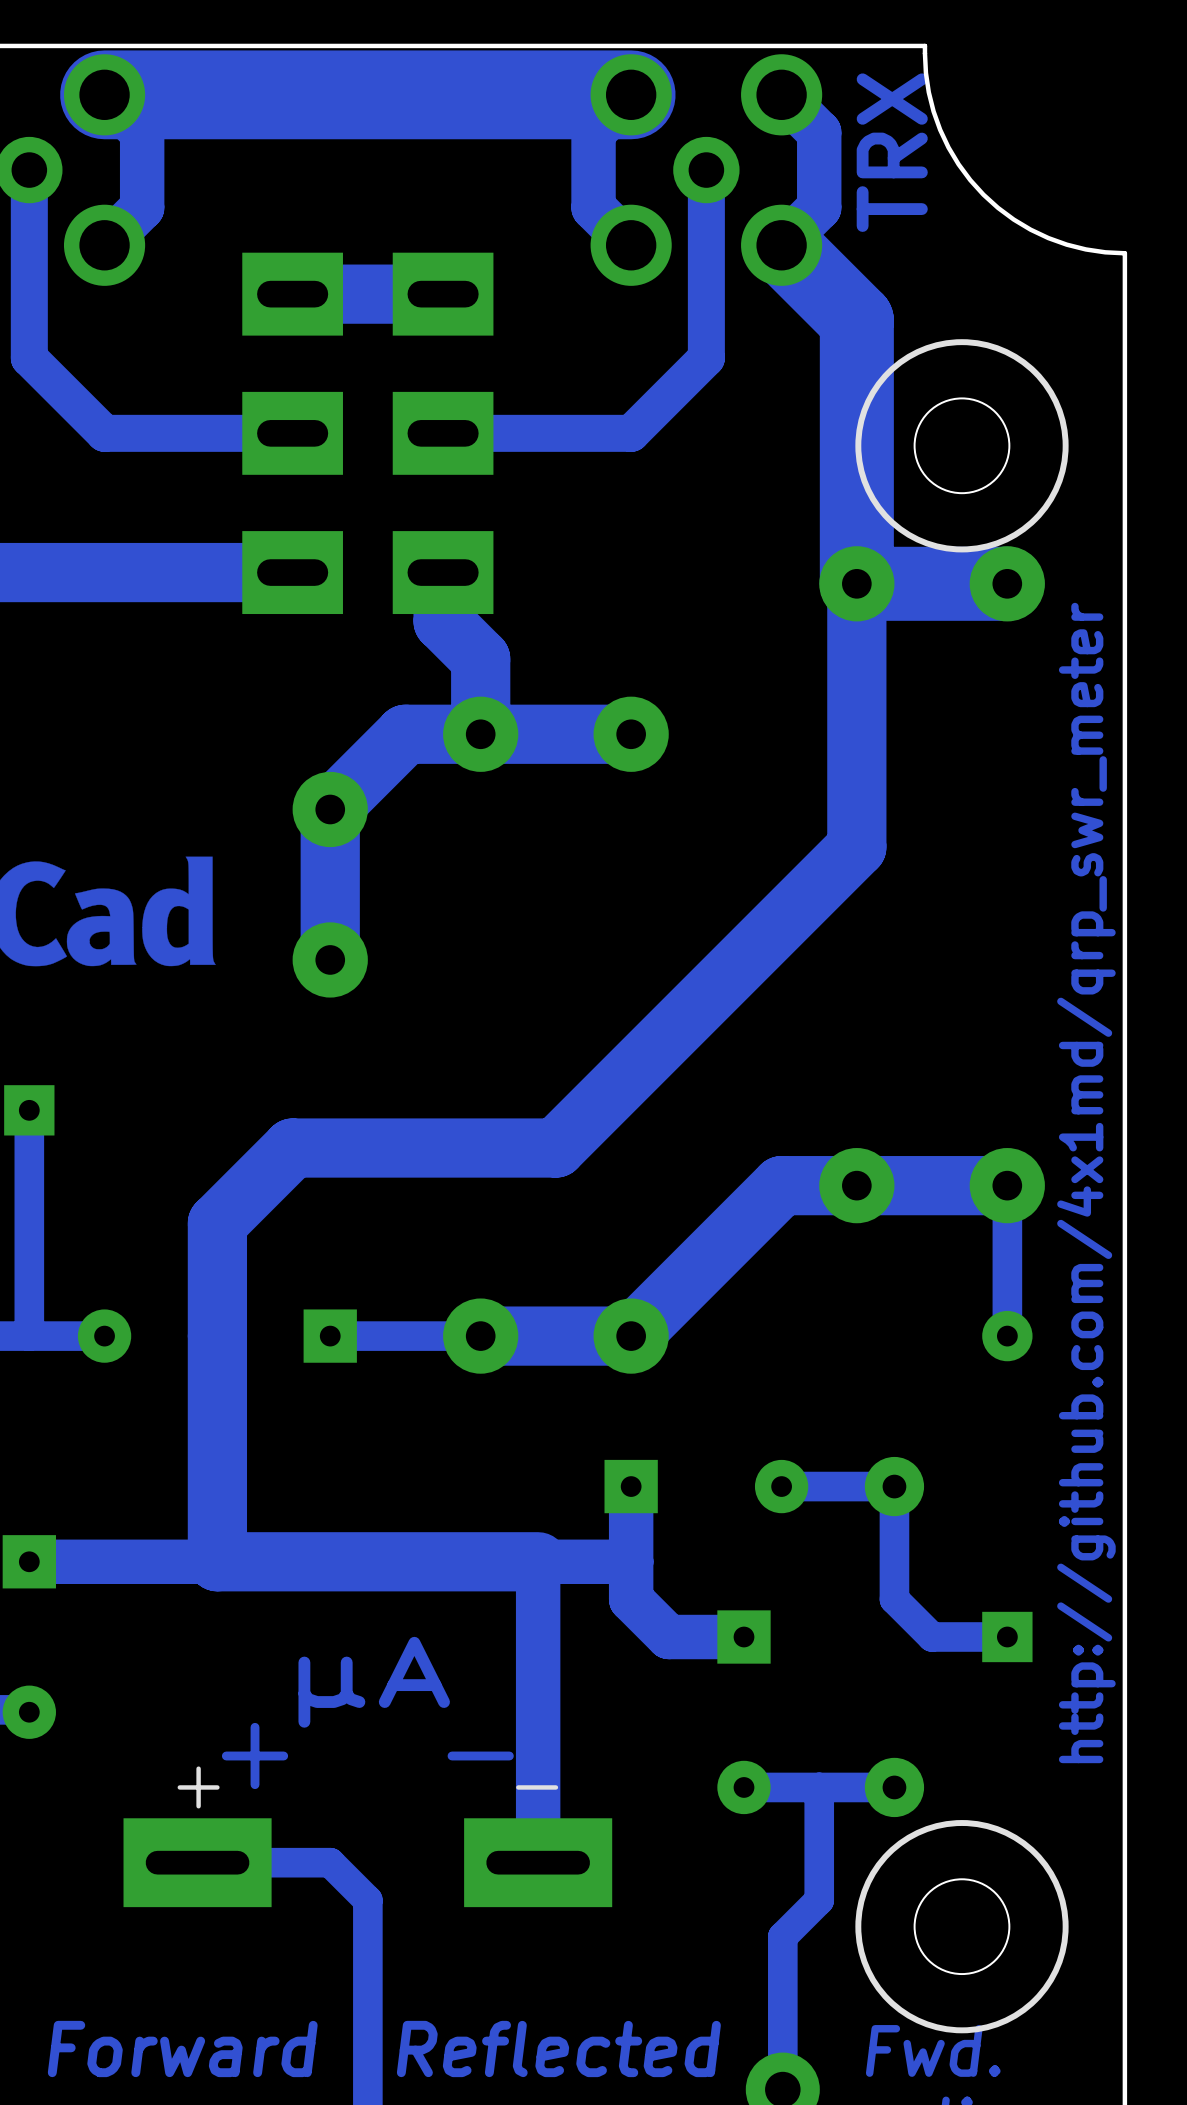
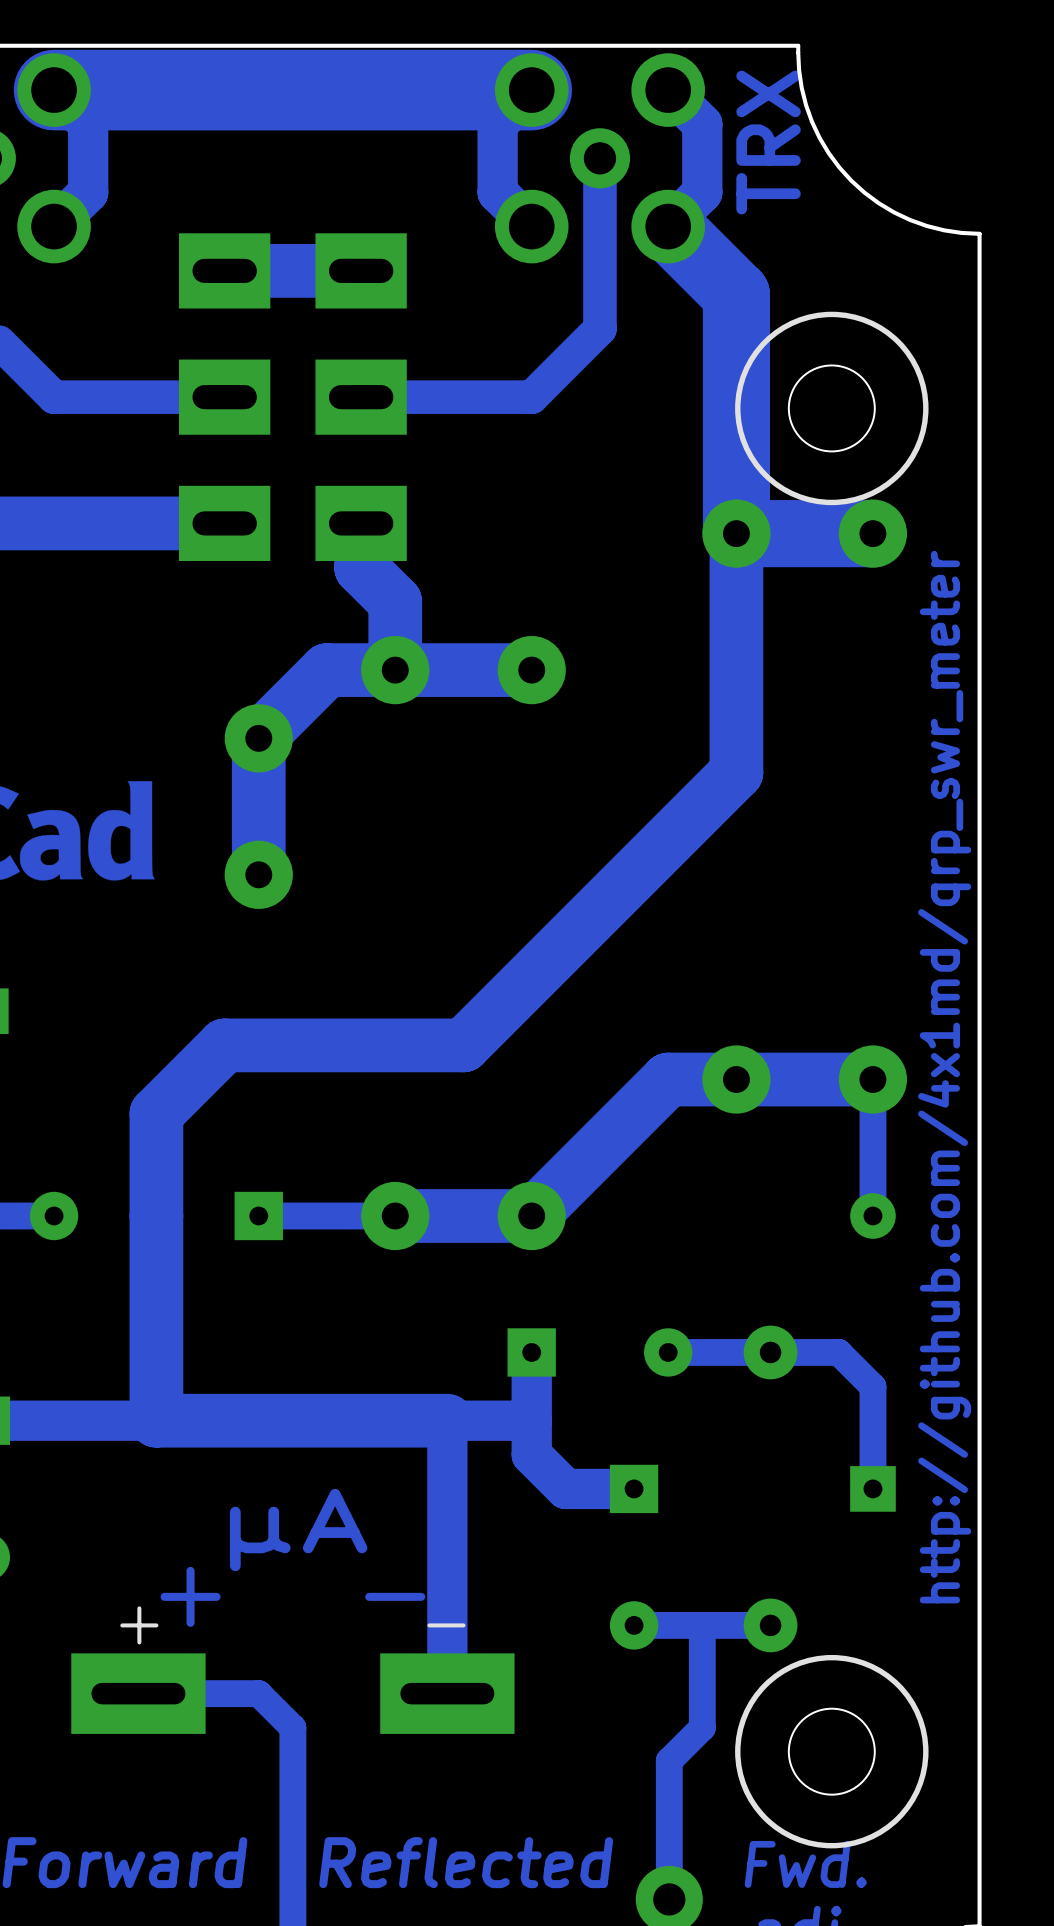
track: (894, 1486) (894, 1599) (932, 1636) (1007, 1636) -> (770, 1352) (838, 1352) (872, 1386) (872, 1488)

